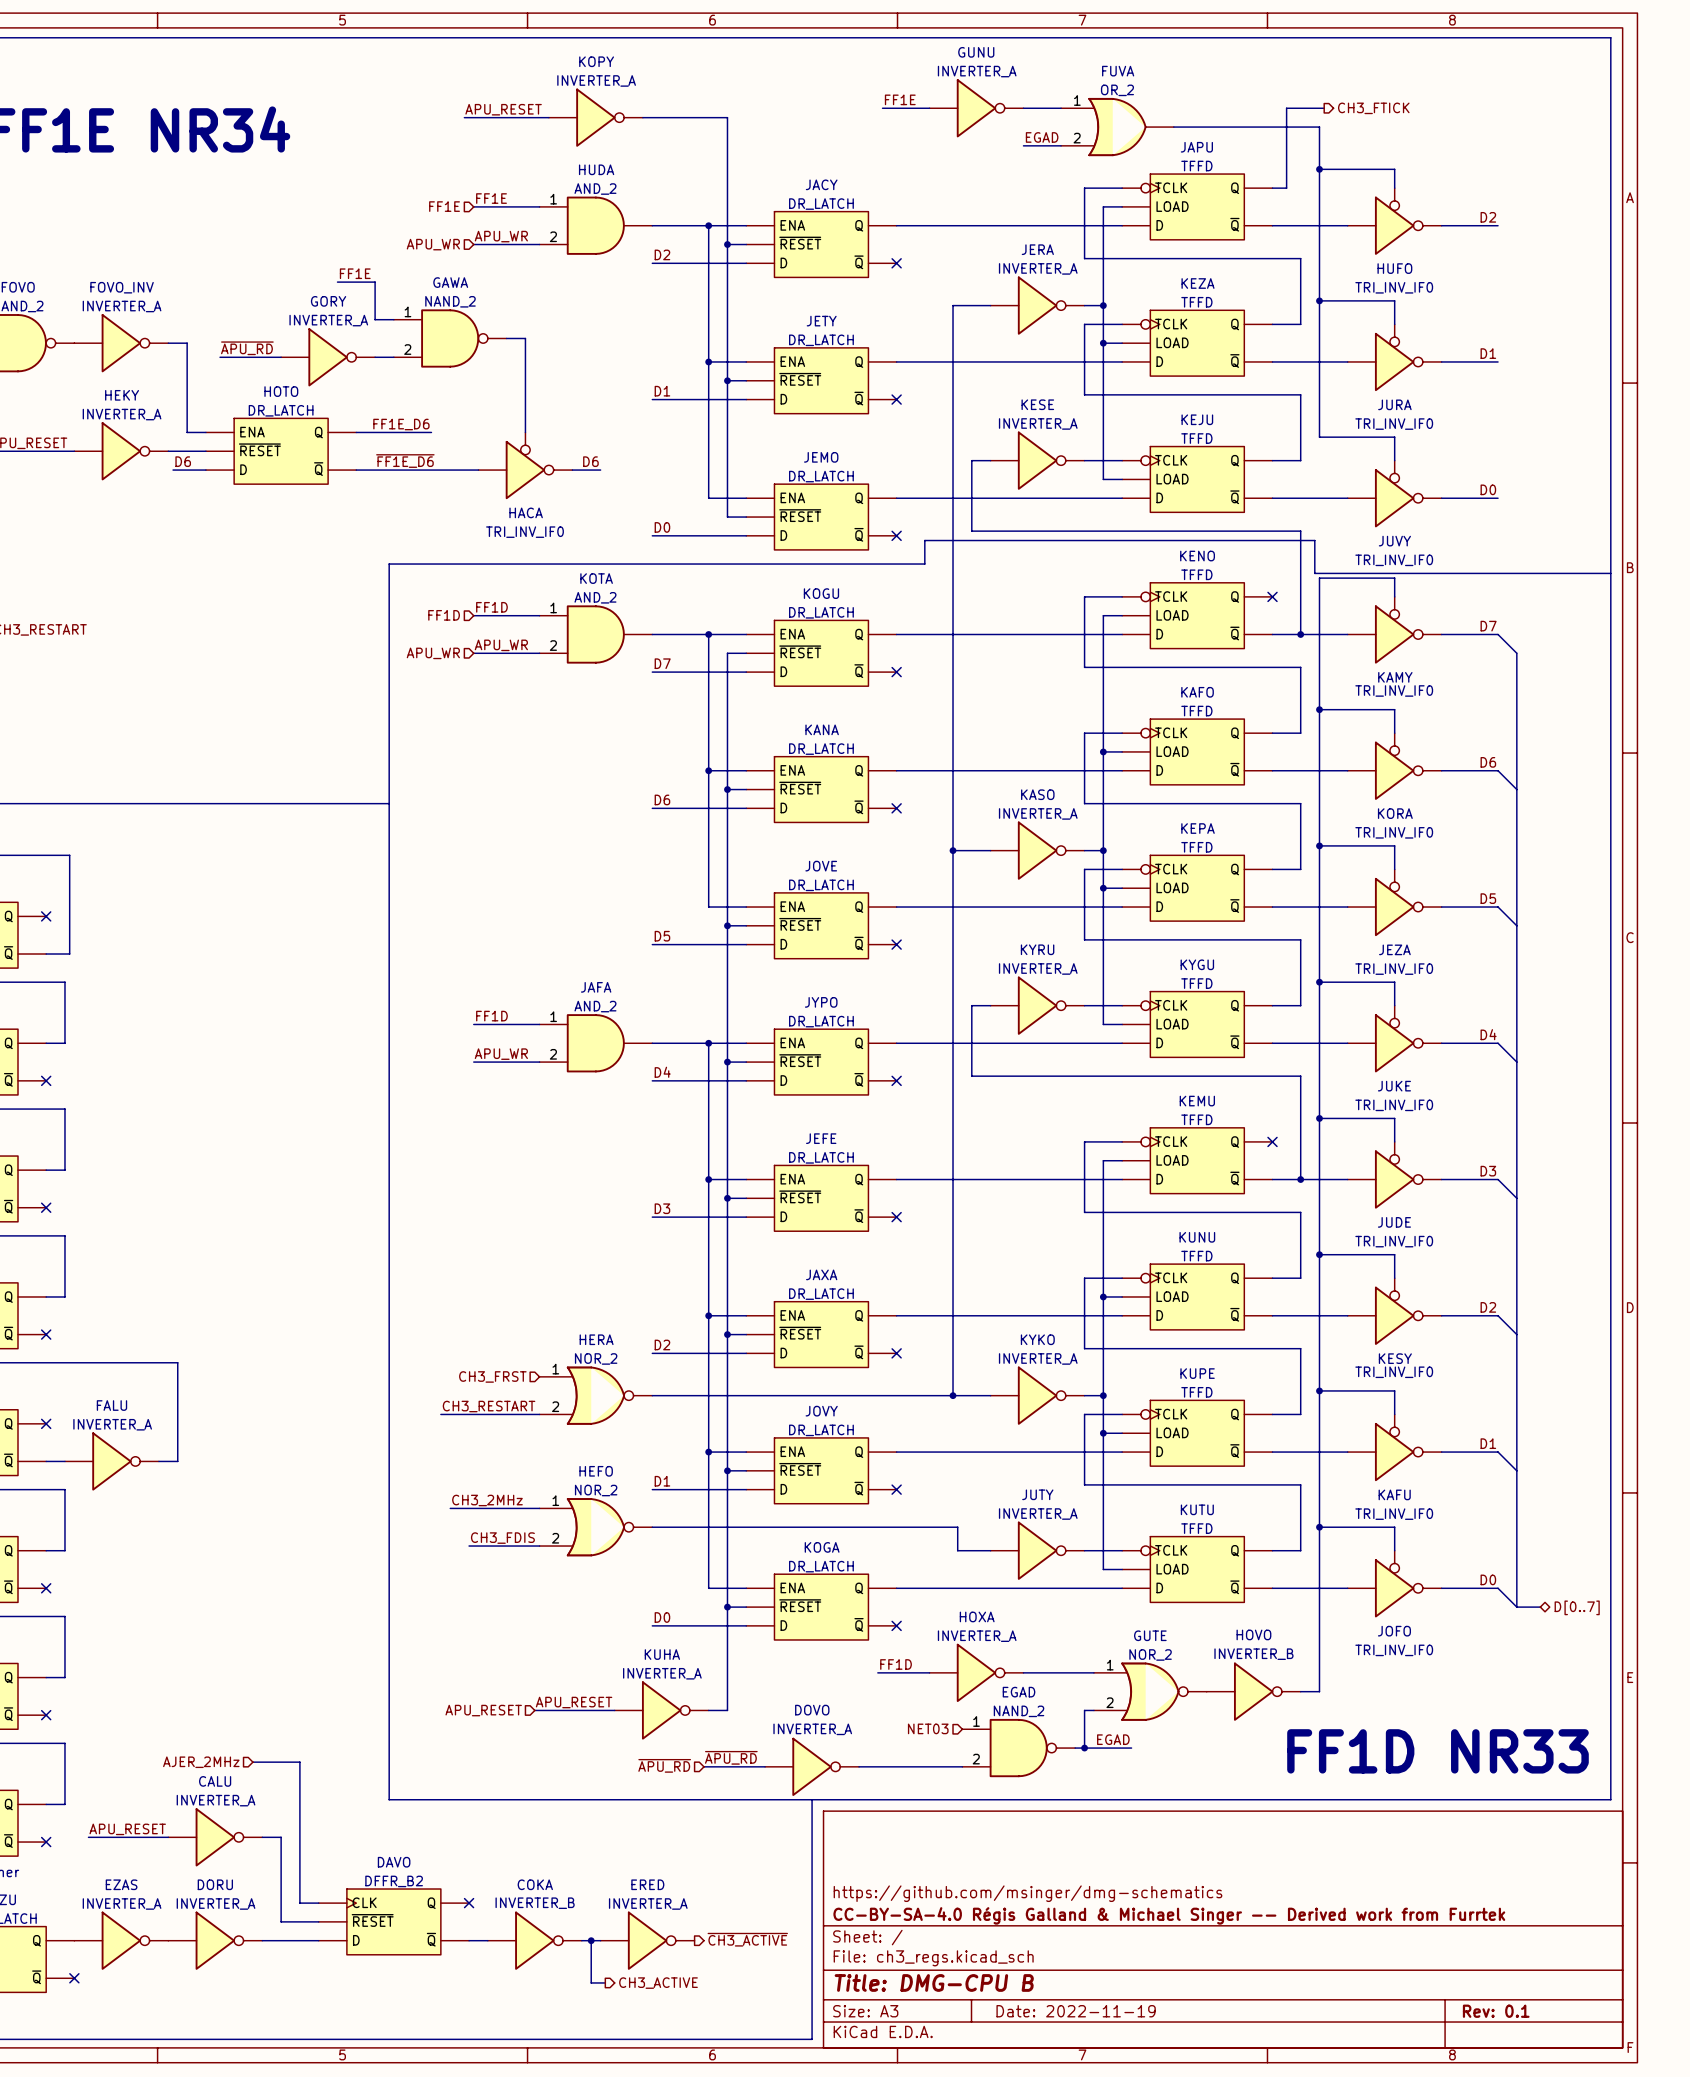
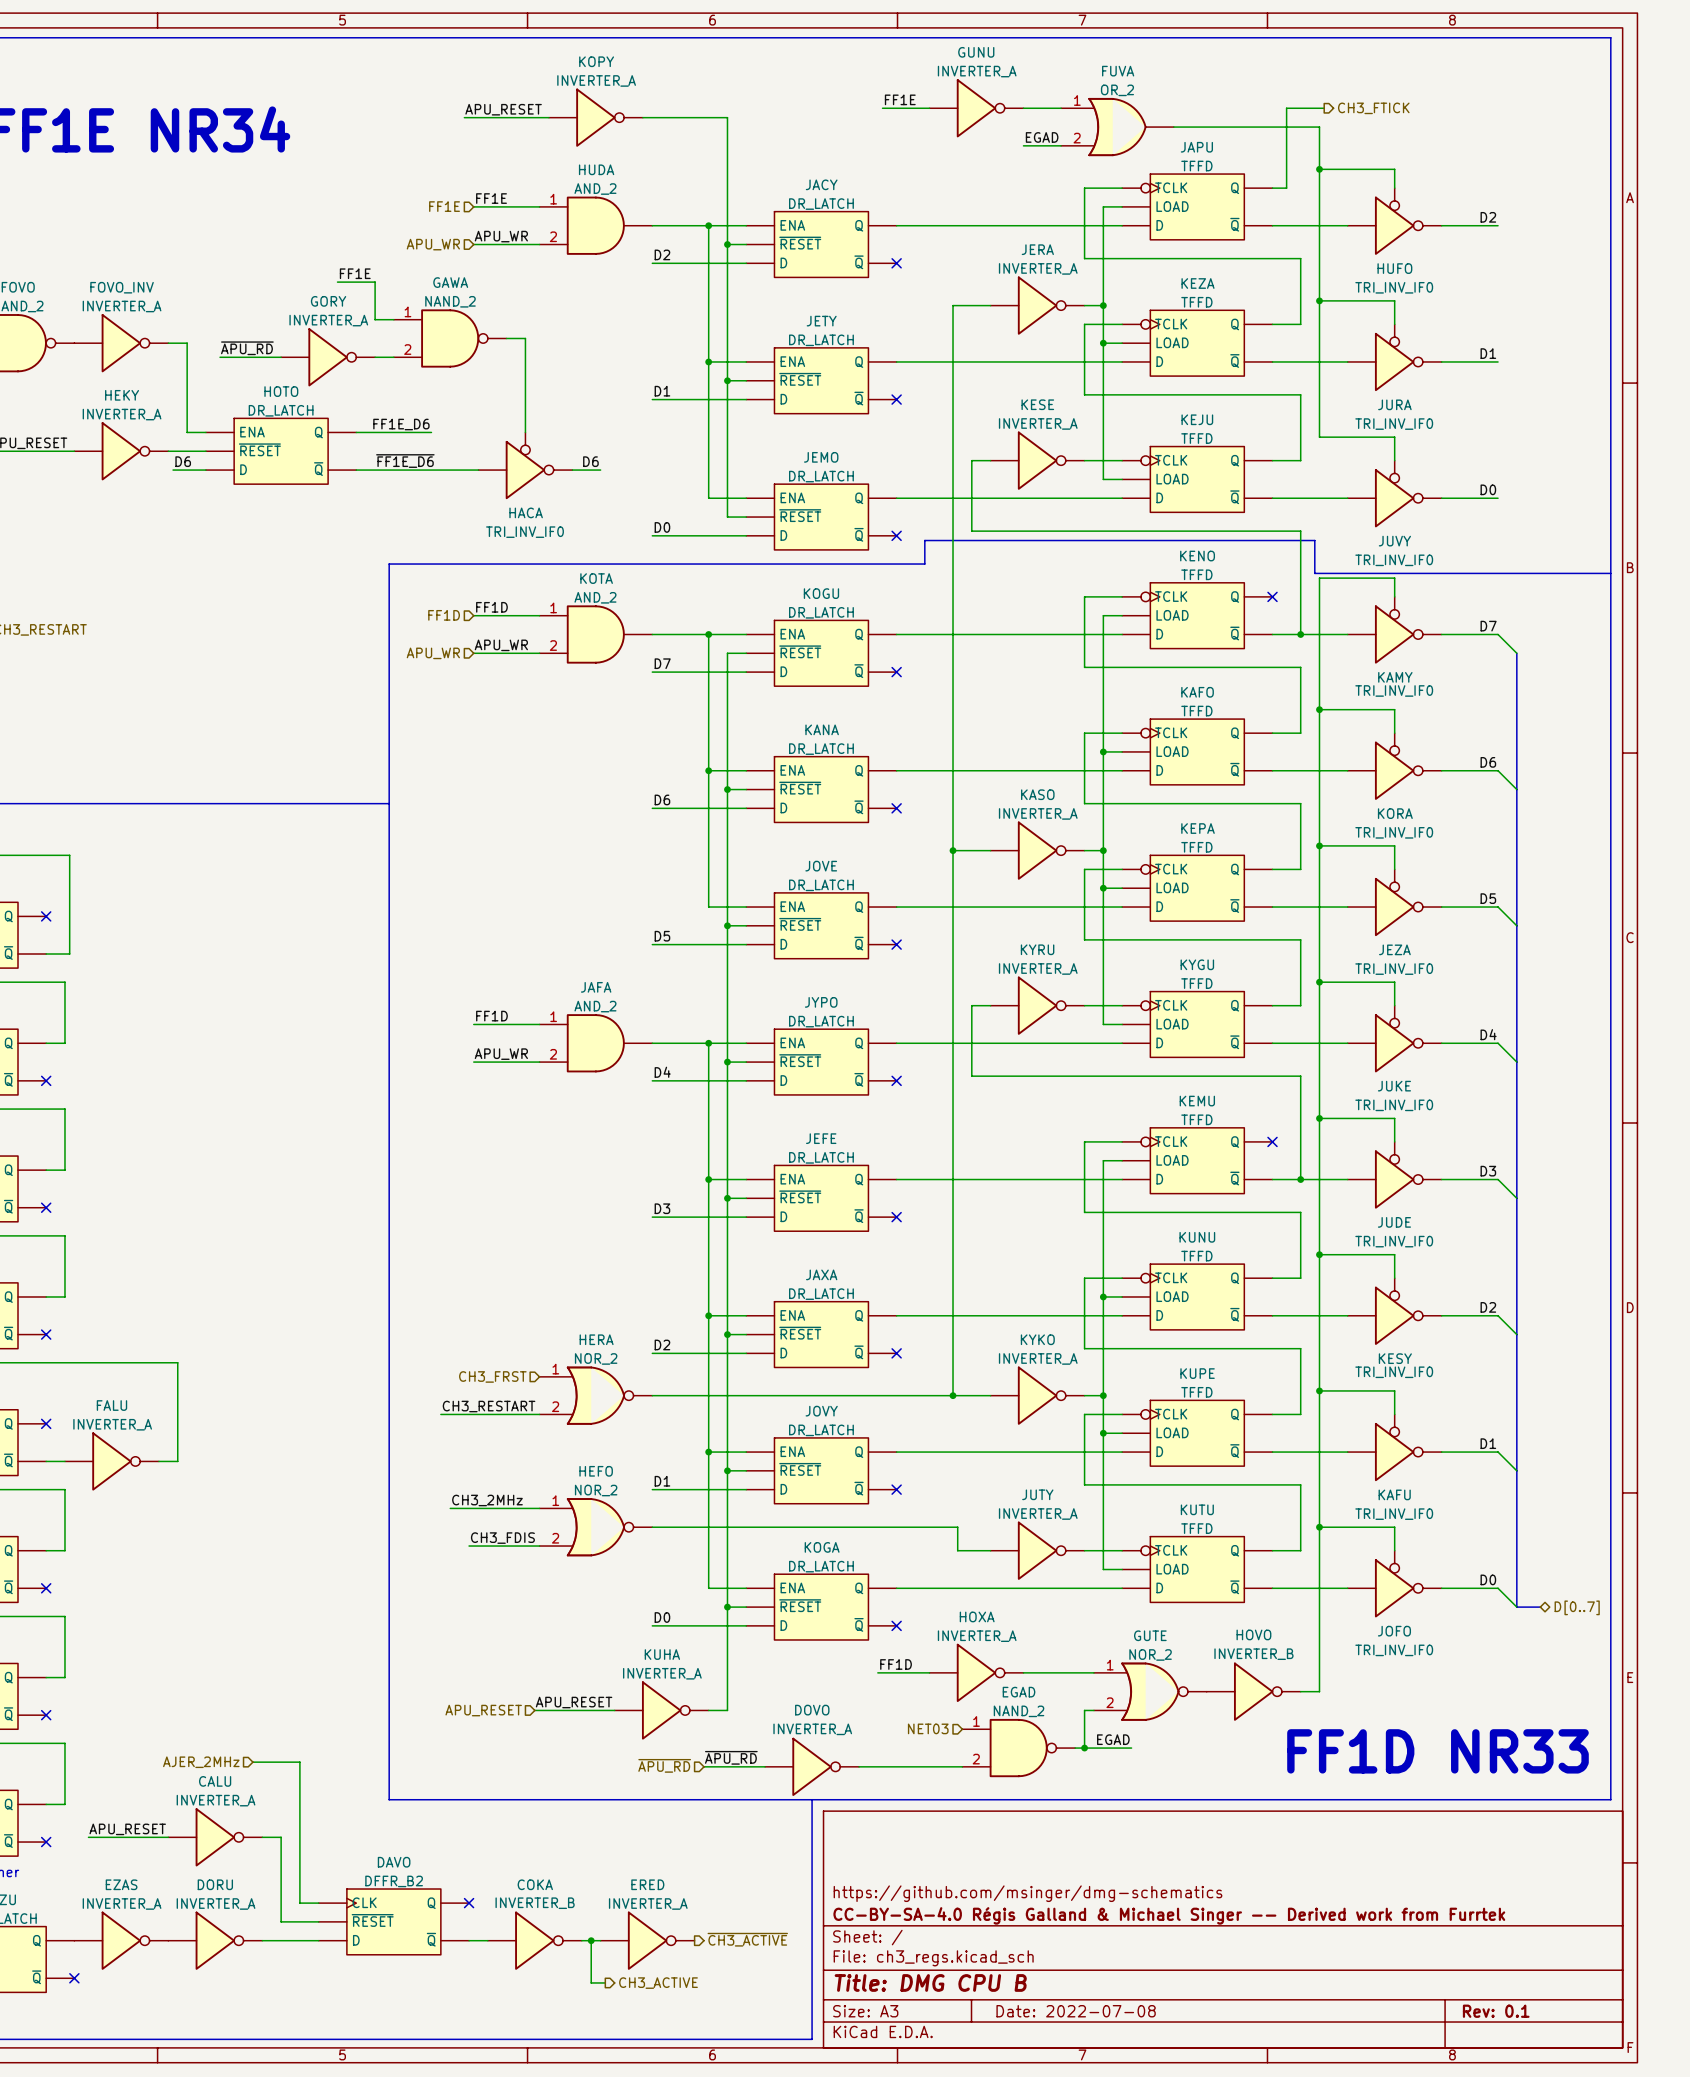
title block: Title: DMG-CPU B (934, 1982) -> Title: DMG CPU B (930, 1982)
title block: Date: 2022-11-19 (1076, 2011) -> Date: 2022-07-08 (1076, 2011)

